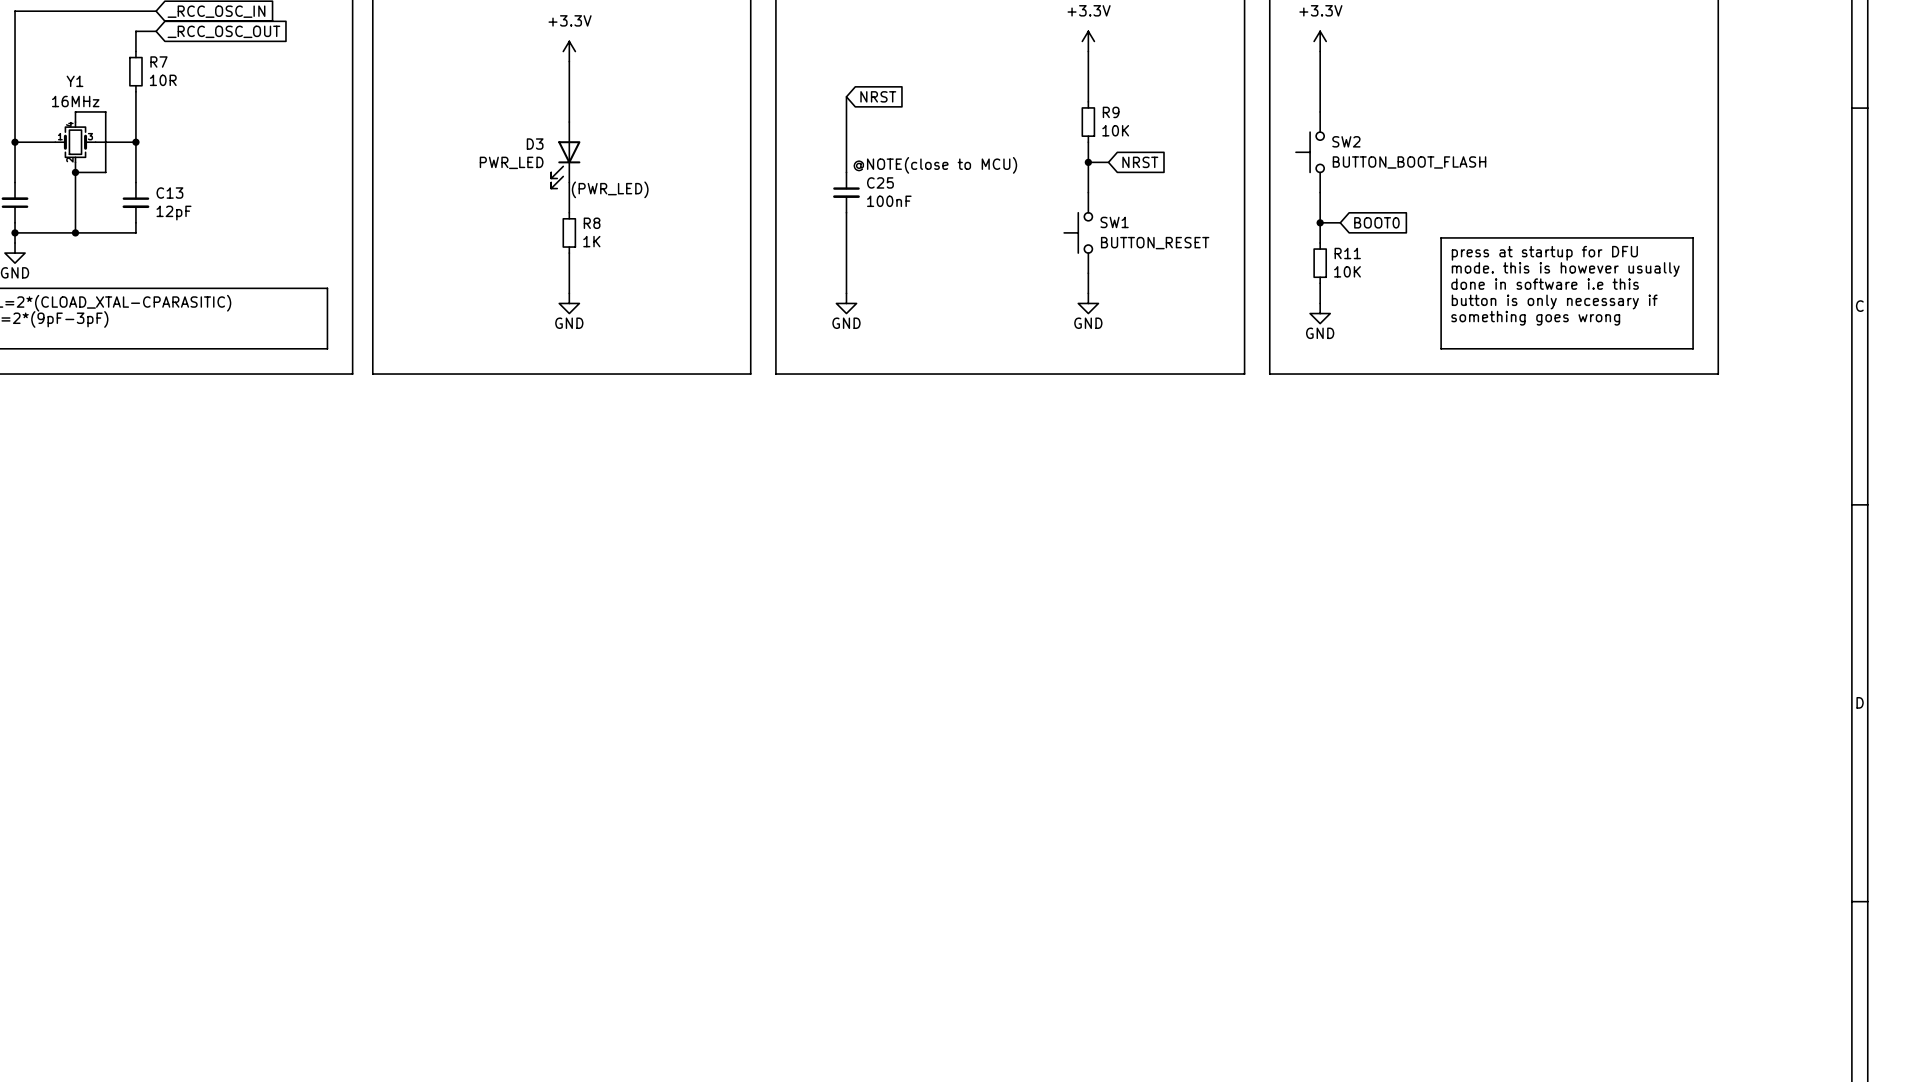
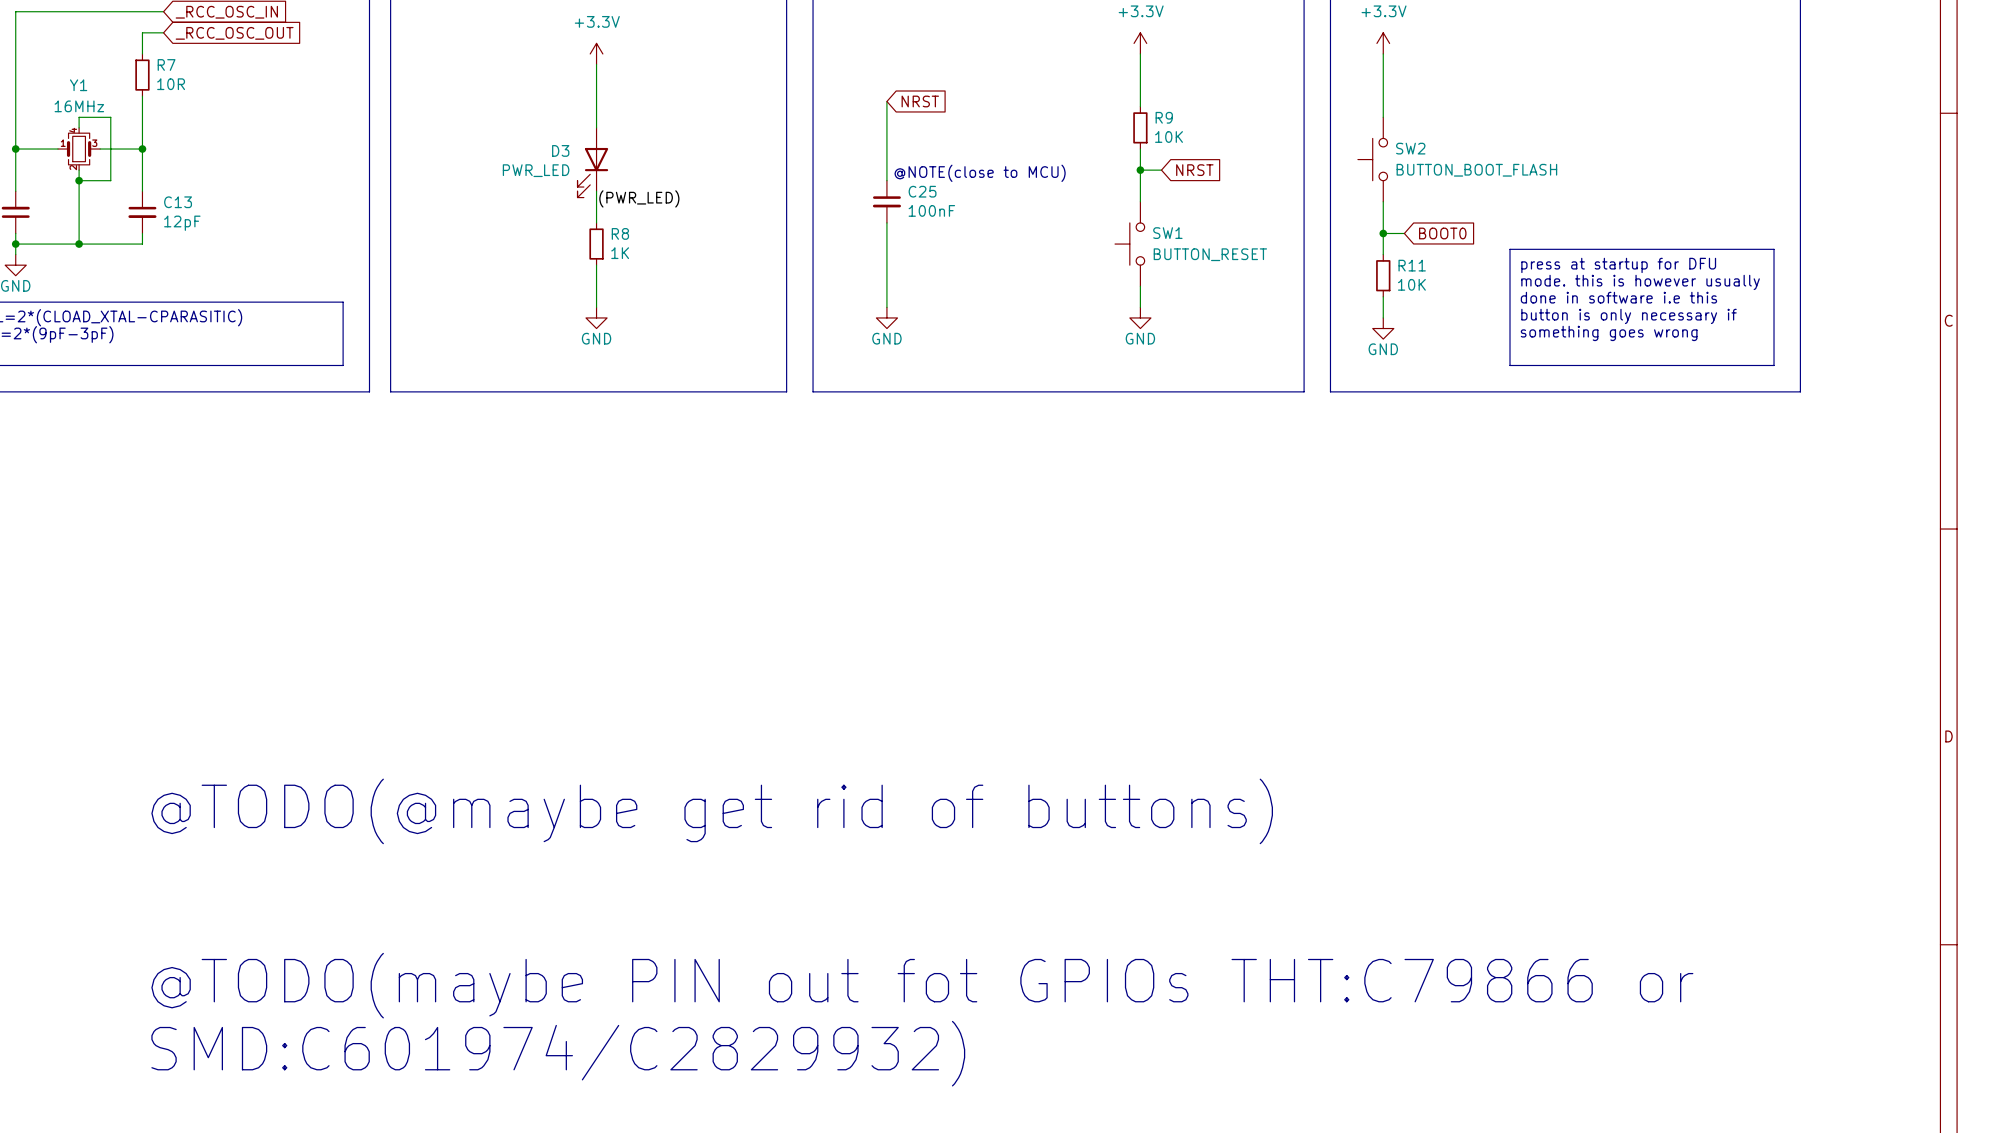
text: none -> @TODO(@maybe get rid of buttons) (712, 811)
text: none -> @TODO(maybe PIN out fot GPIOs THT:C79866 or (922, 985)
text: none -> SMD:C601974/C2829932) (558, 1053)

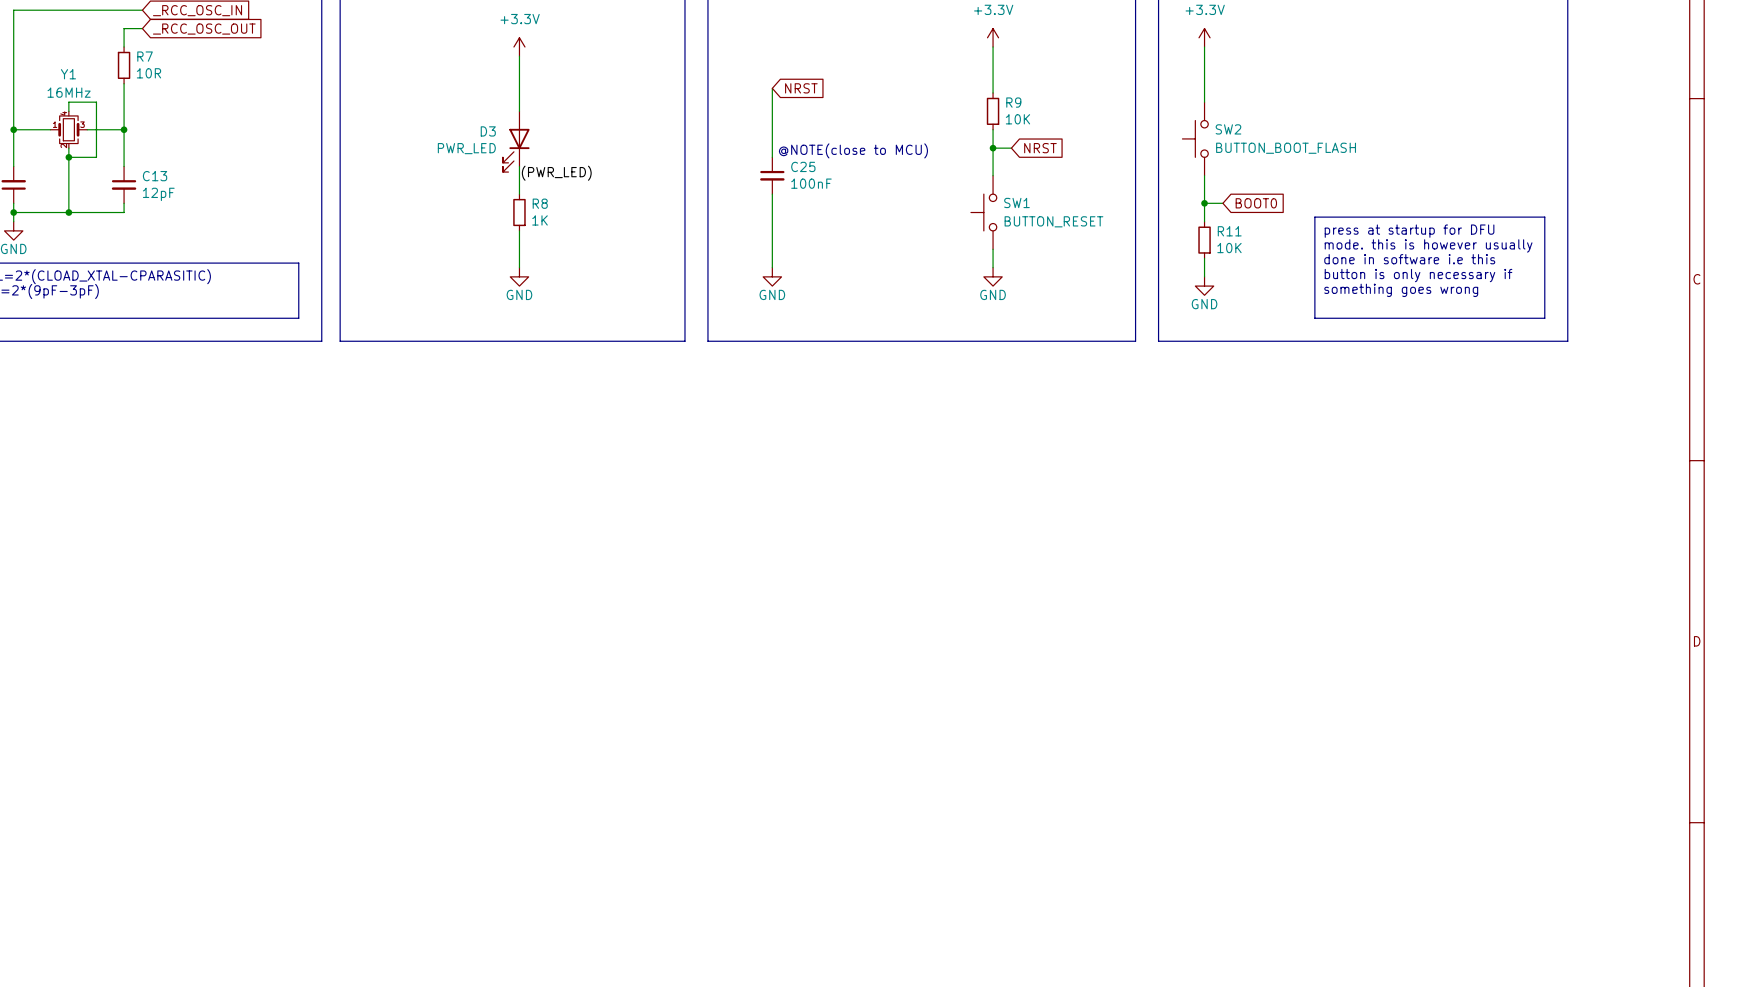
text: @TODO(@maybe get rid of buttons) (712, 811) -> none
text: @TODO(maybe PIN out fot GPIOs THT:C79866 or (922, 985) -> none
text: SMD:C601974/C2829932) (558, 1053) -> none

